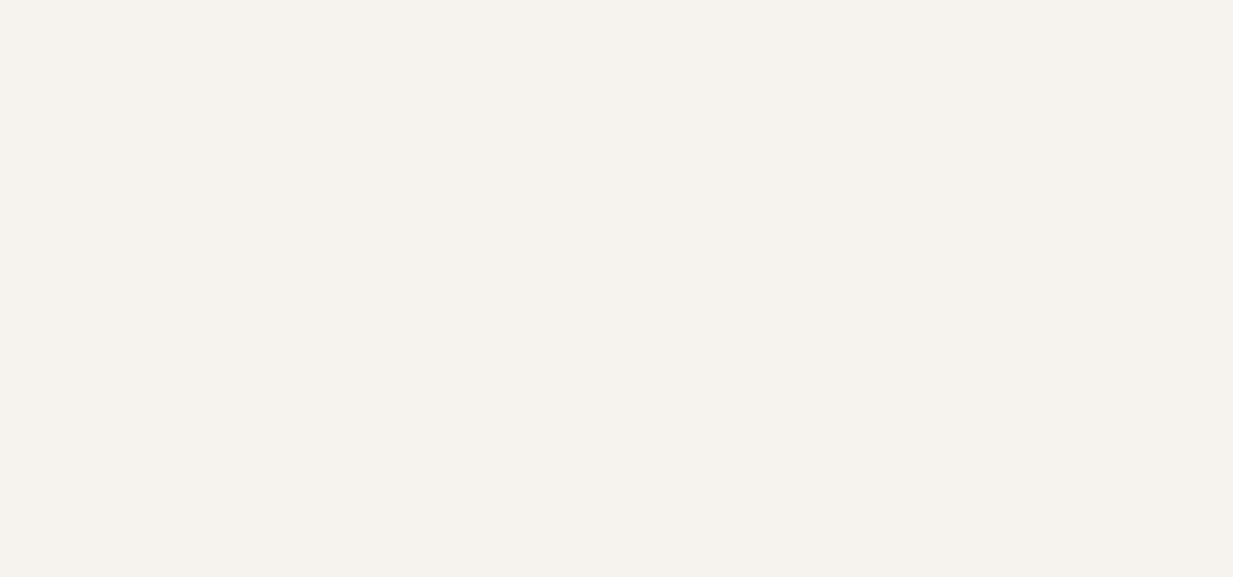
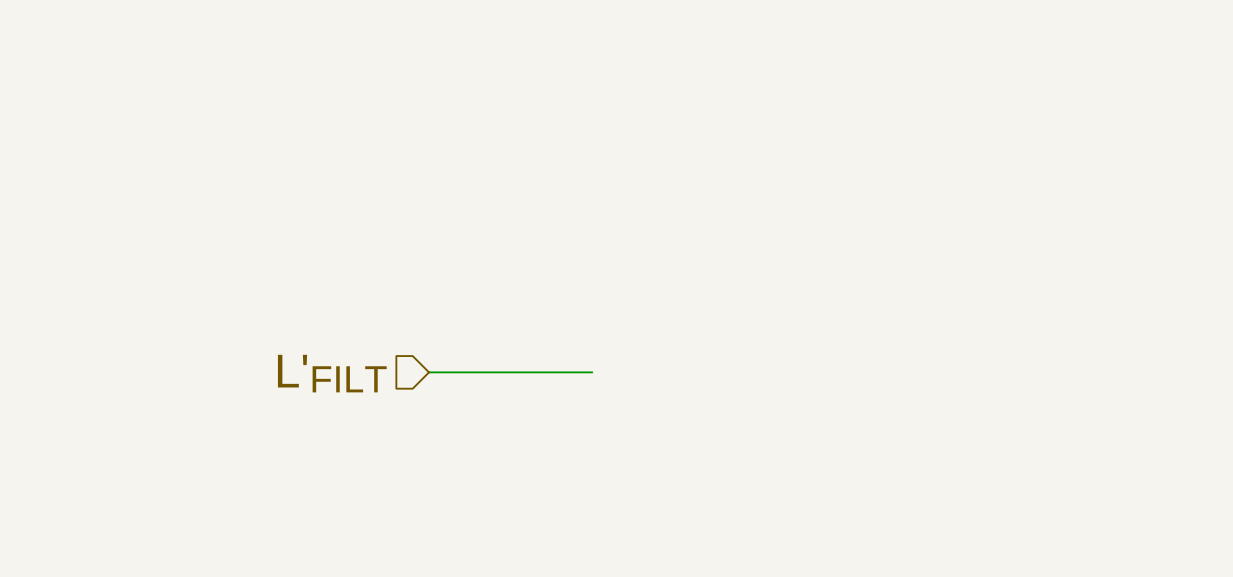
wire: none -> (429, 372) (592, 372)
hierarchical label: none -> L'FILT (332, 373)

